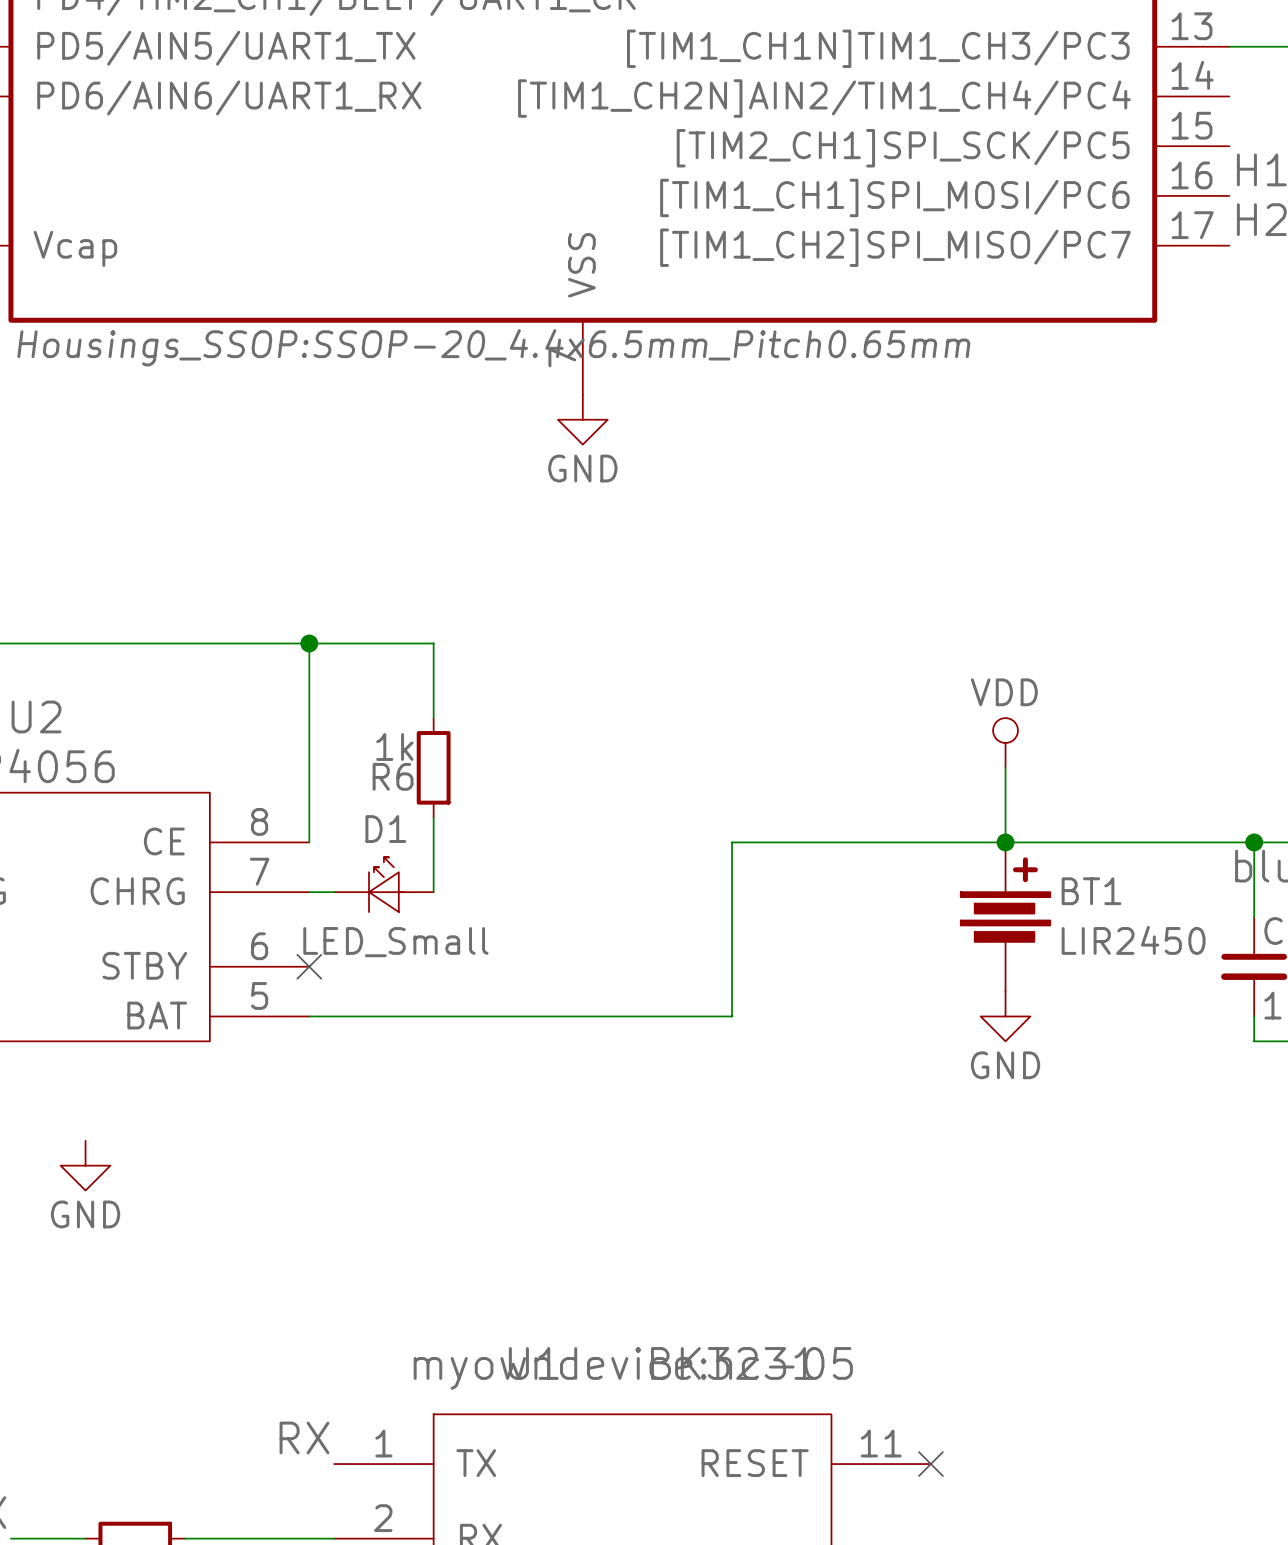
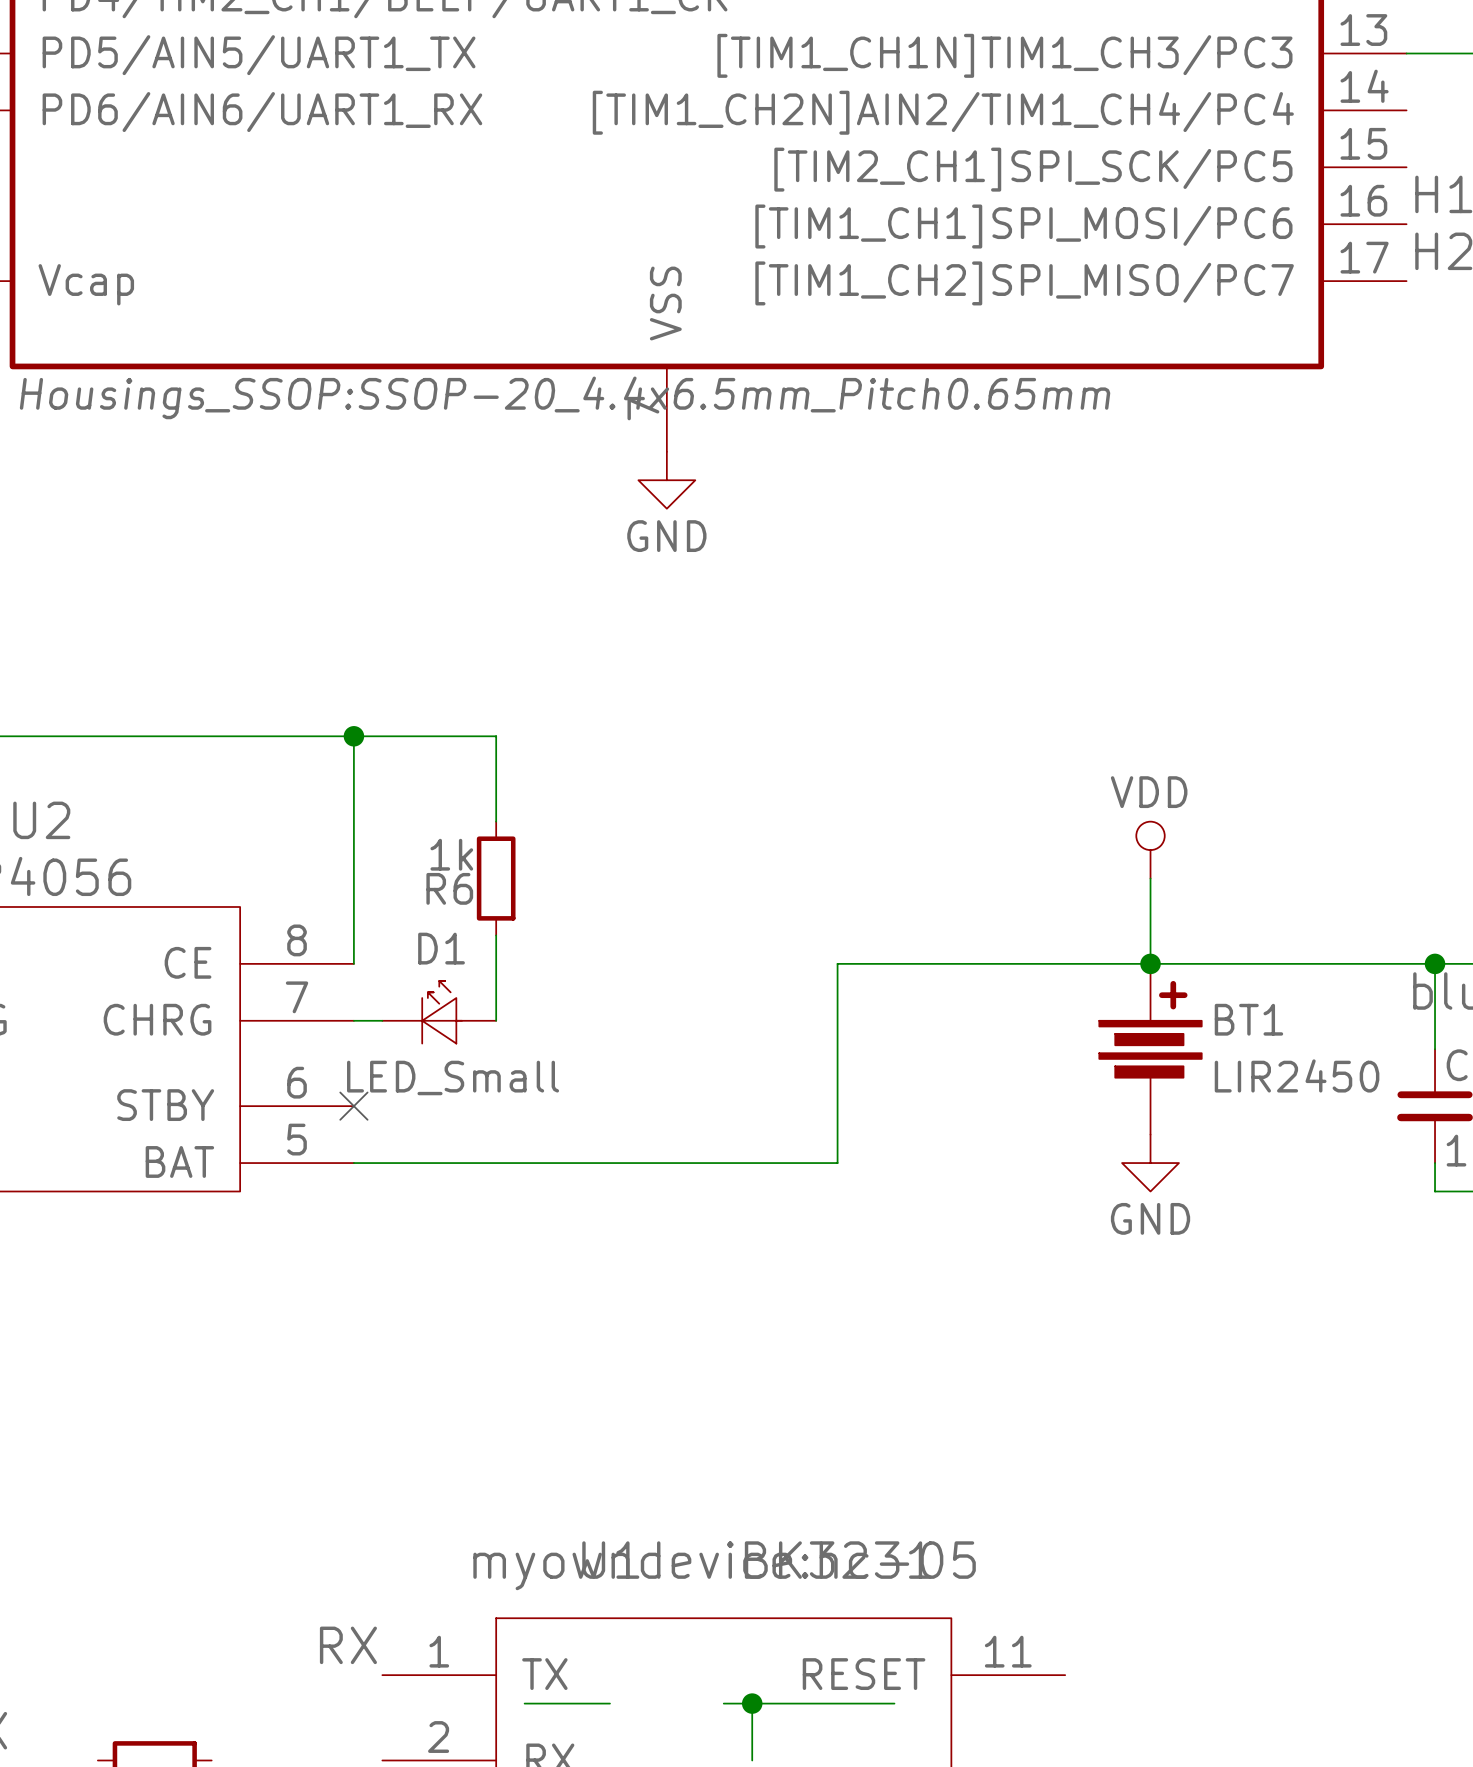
power symbol: GND (85, 1165) -> none
no-connect mark: (930, 1464) -> none
wire: none -> (752, 1703) (752, 1760)
junction: none -> (752, 1703)
wire: (10, 1538) (85, 1538) -> (524, 1703) (609, 1703)
wire: (185, 1538) (334, 1538) -> (723, 1703) (894, 1703)

